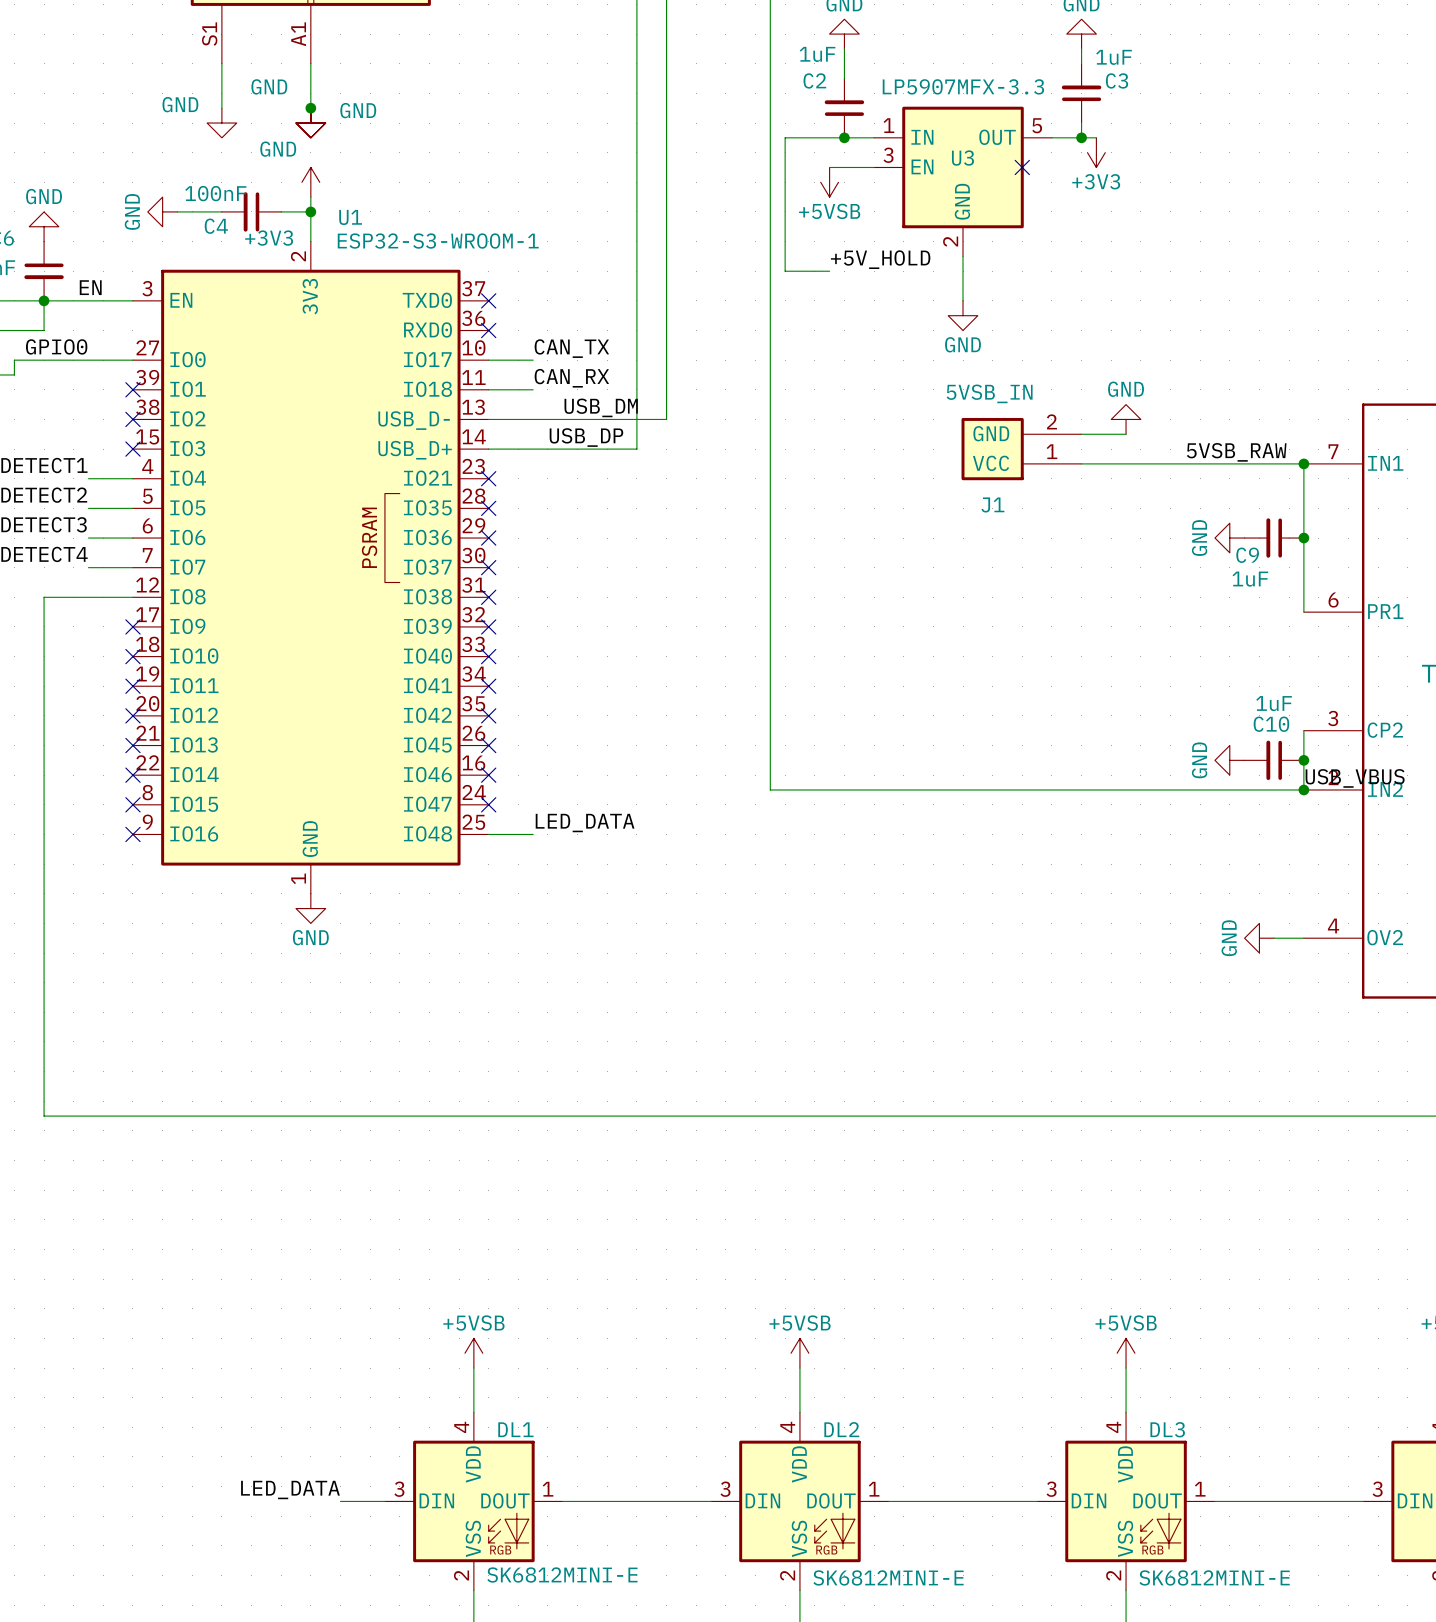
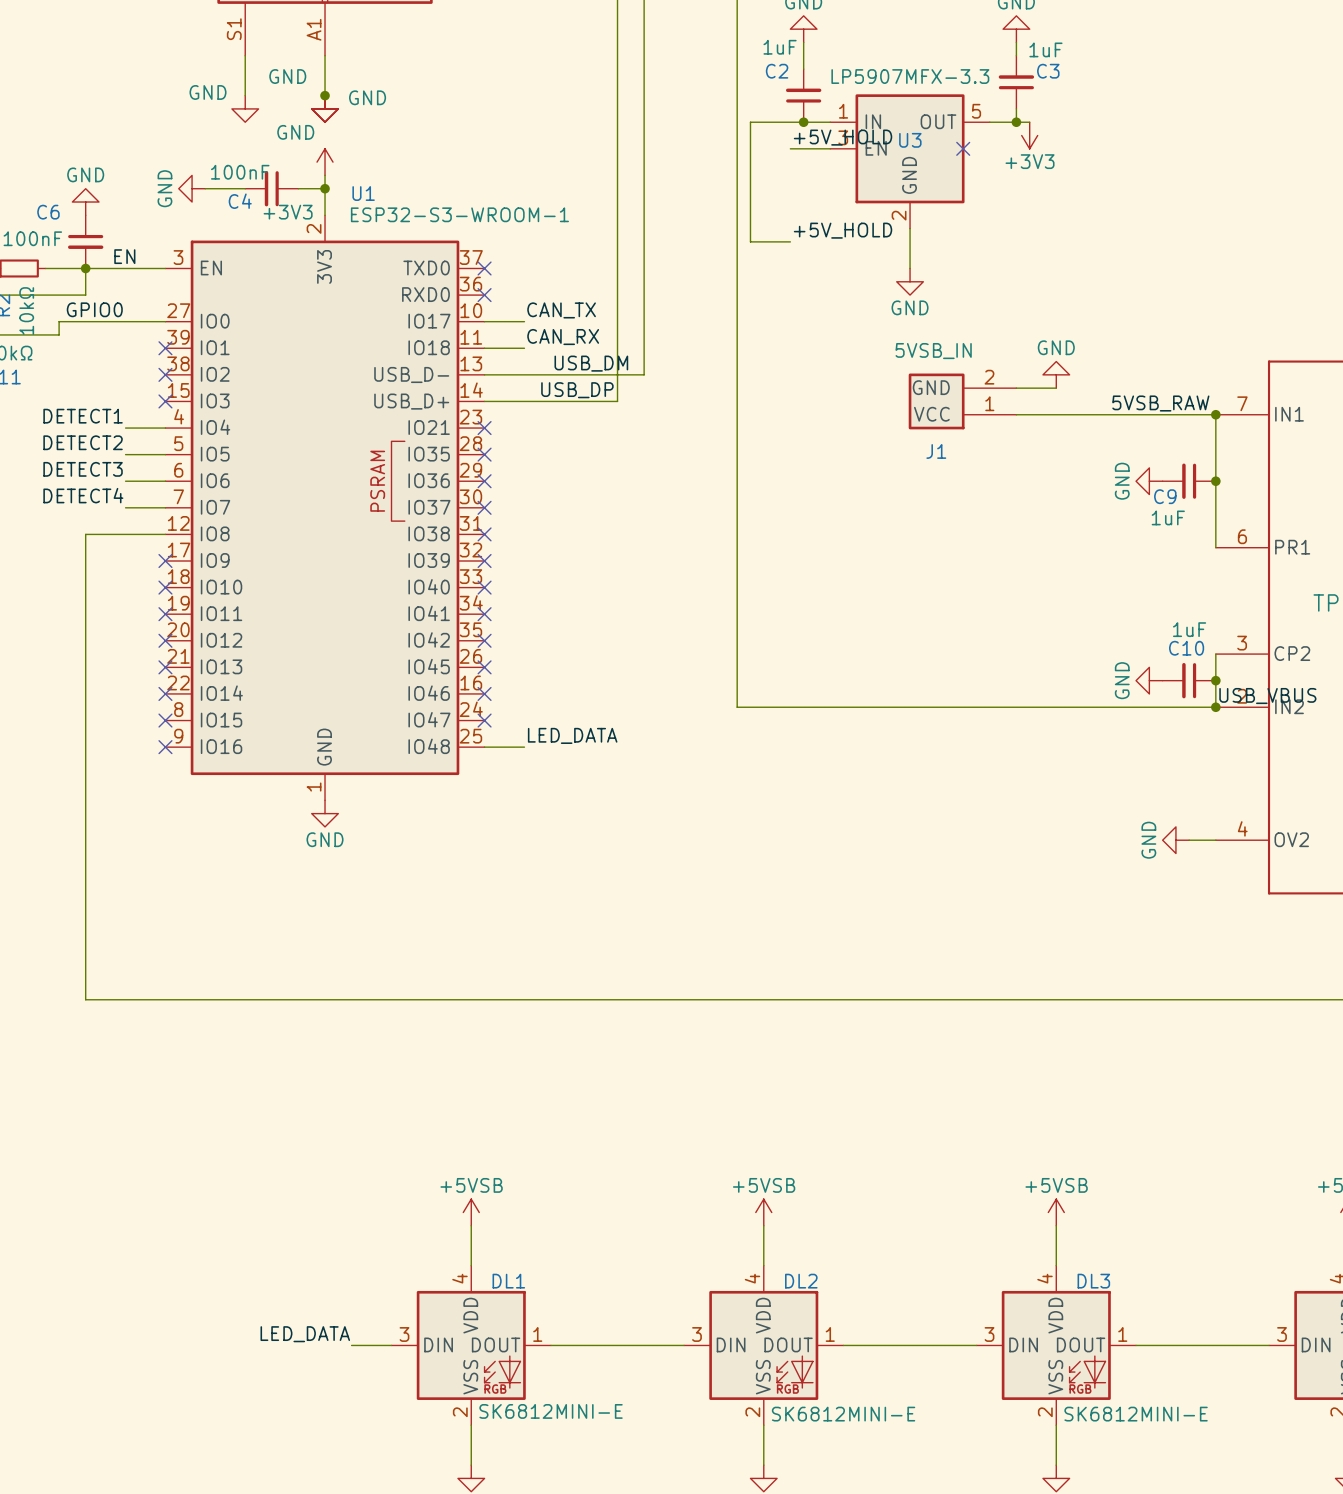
label: none -> +5V_HOLD (843, 137)
power symbol: +5VSB (829, 182) -> none

